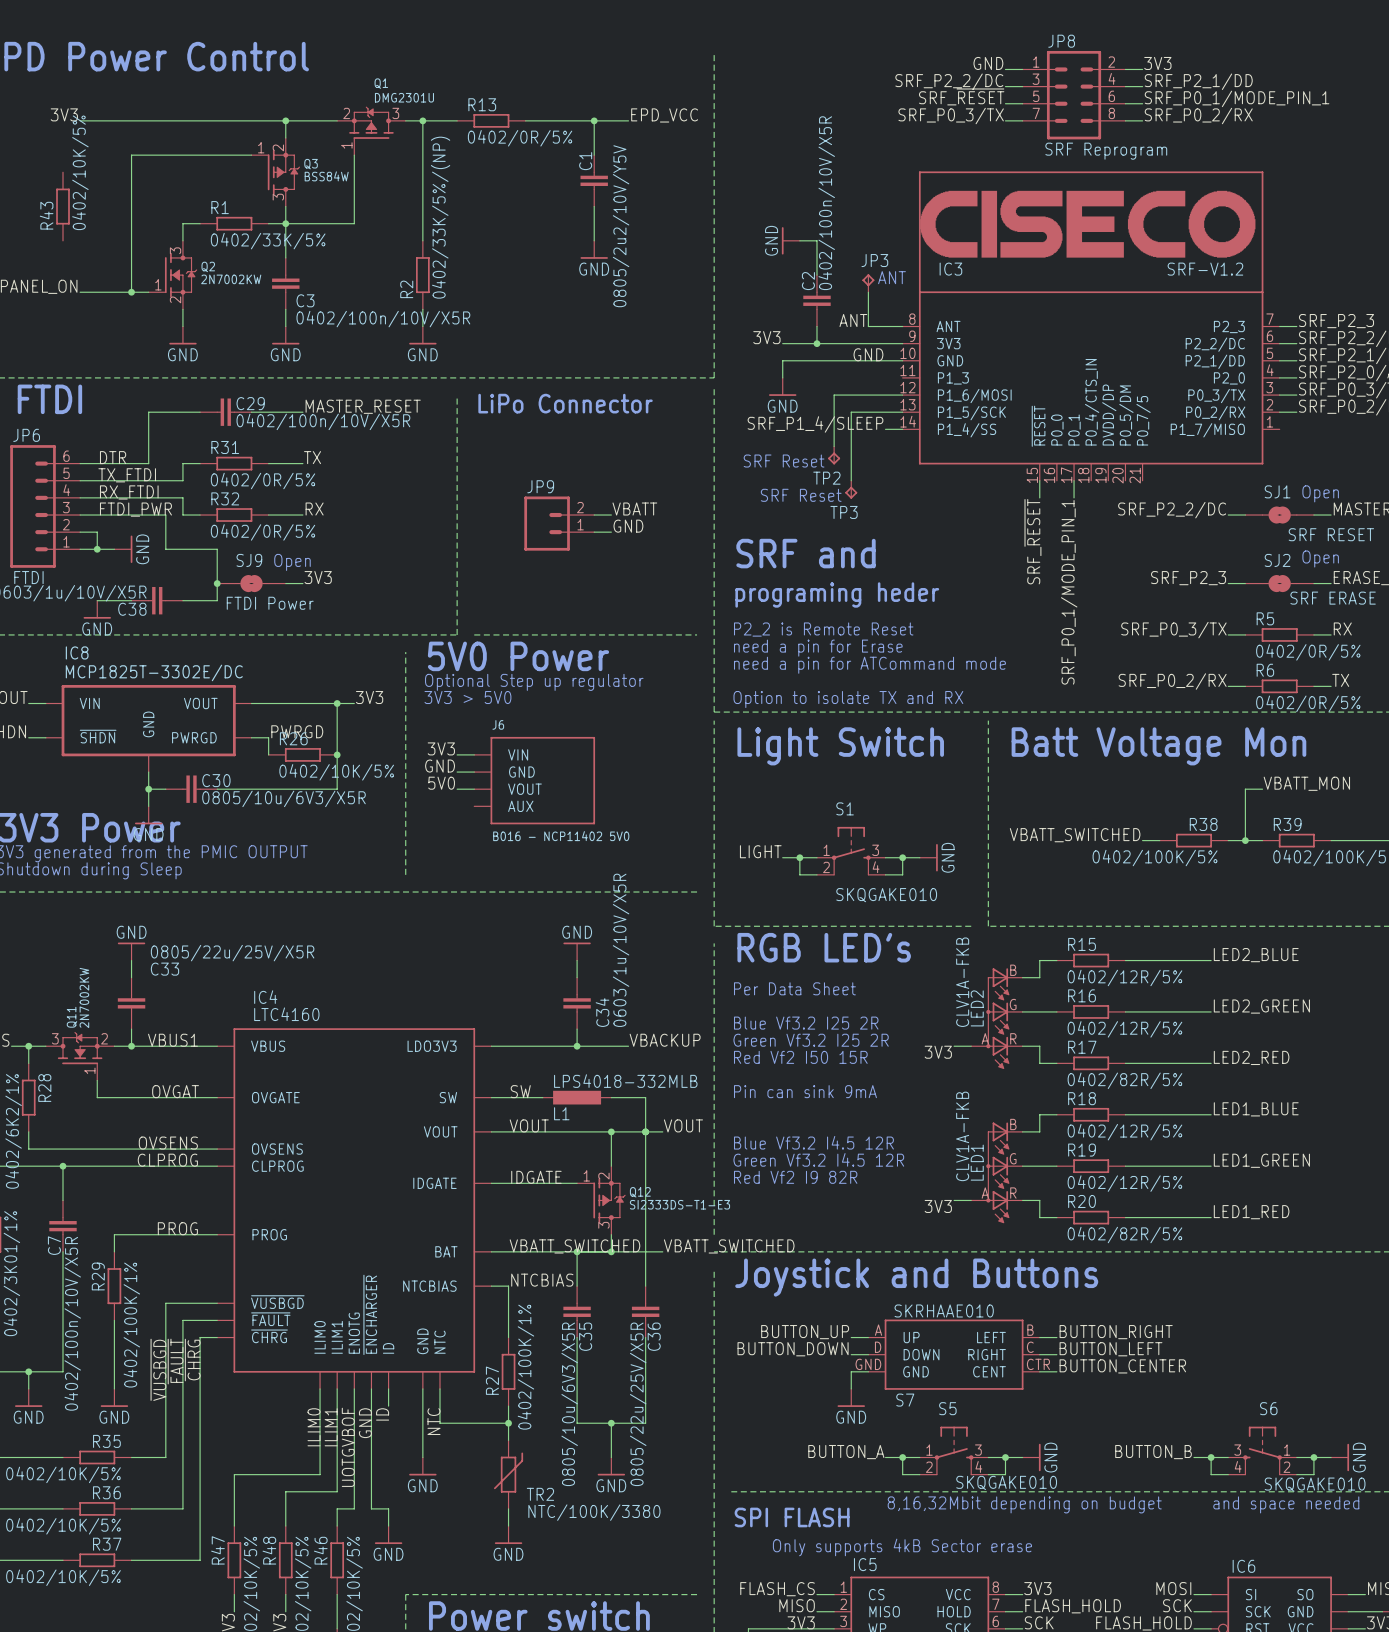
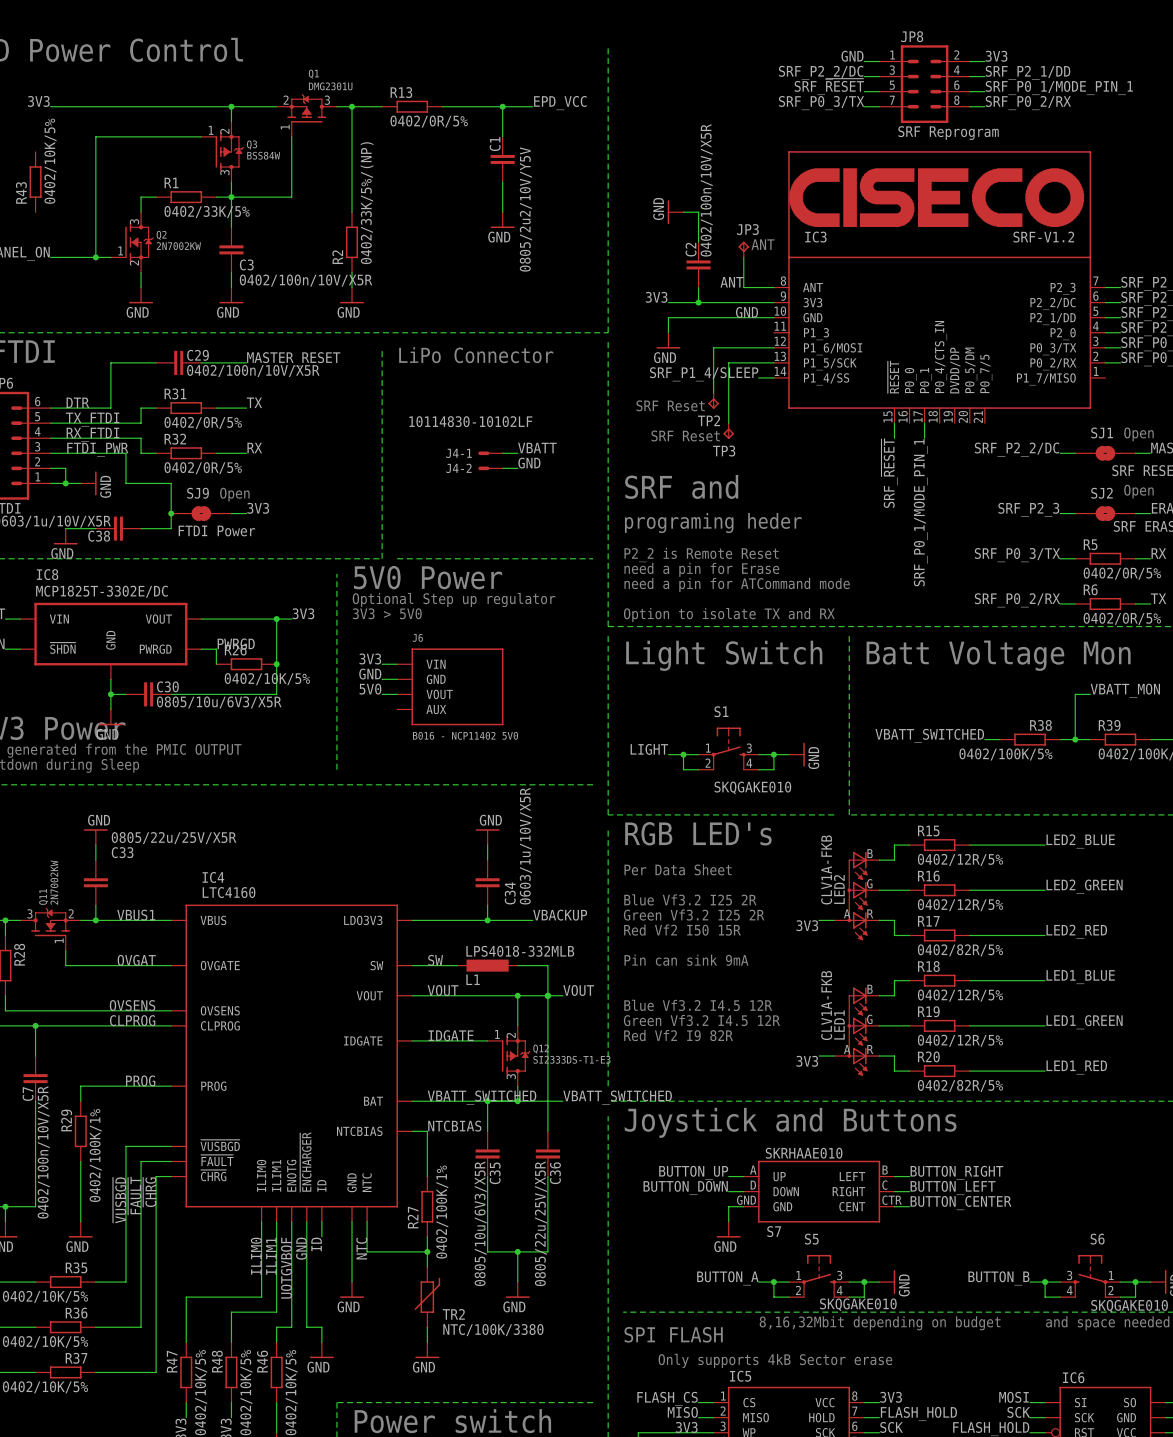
J4-1: none -> 10114830-10102LF (490, 453)
JP9: (559, 523) -> none
J4-2: none -> (490, 468)

